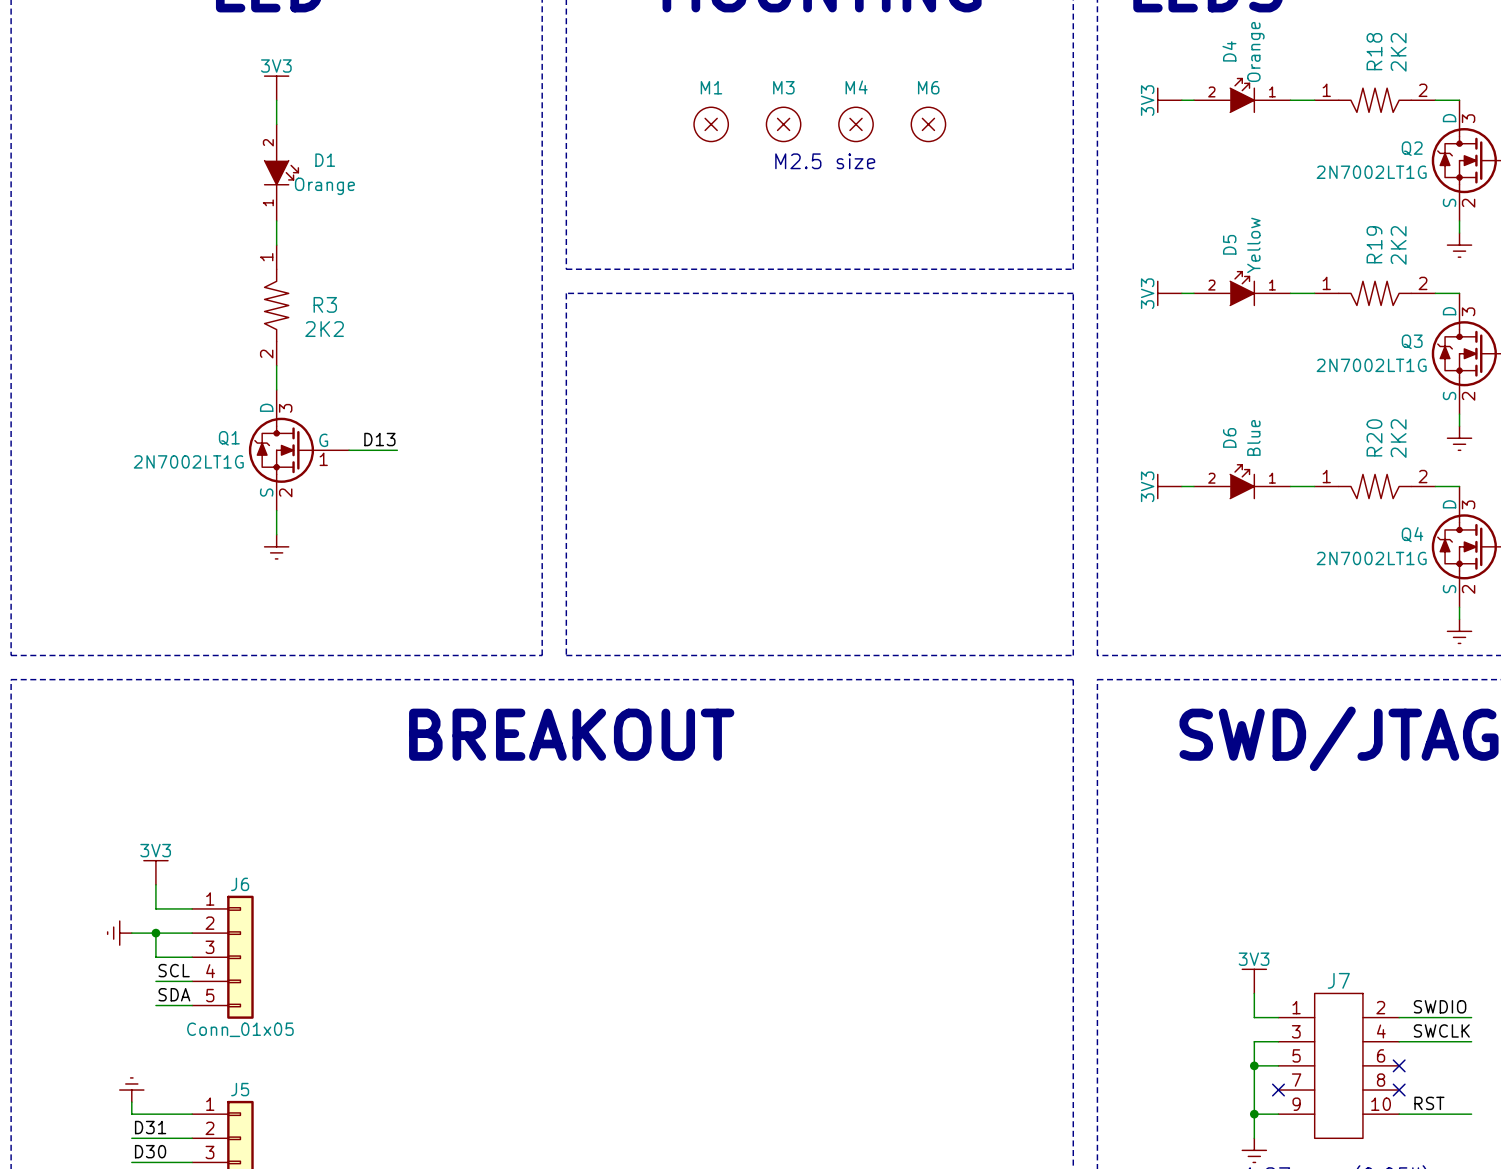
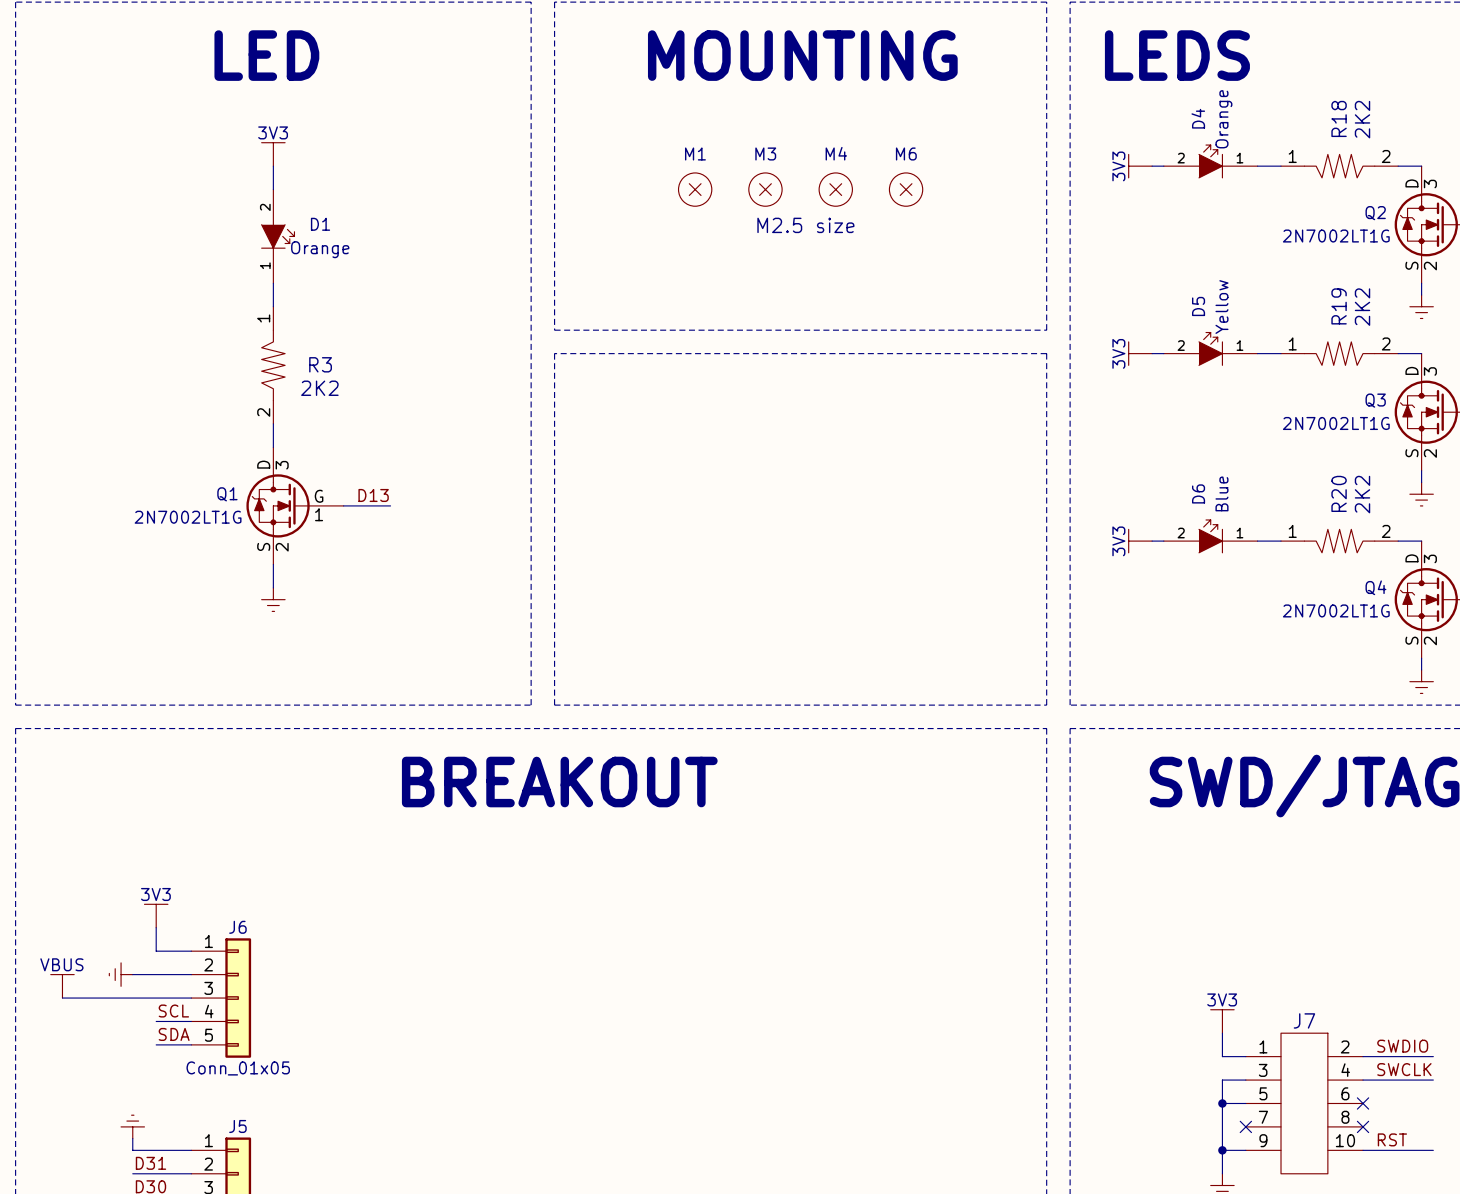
wire: (155, 933) (155, 957) -> (62, 998) (156, 998)
junction: (155, 933) -> none
power symbol: none -> VBUS (62, 986)

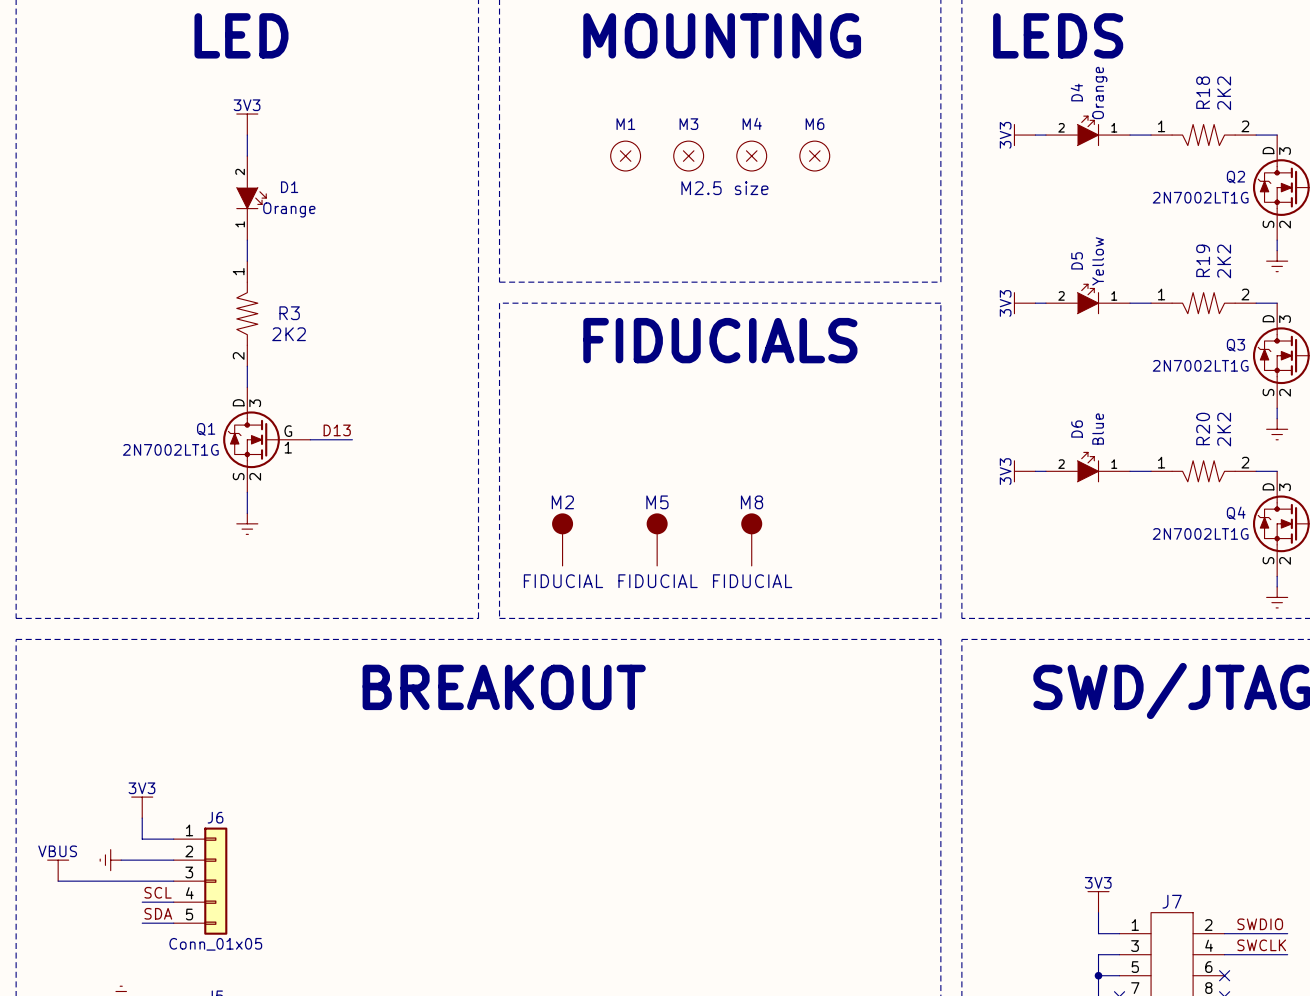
text: none -> FIDUCIALS (720, 340)
M2: none -> FIDUCIAL (562, 539)
M5: none -> FIDUCIAL (657, 539)
M8: none -> FIDUCIAL (751, 539)

